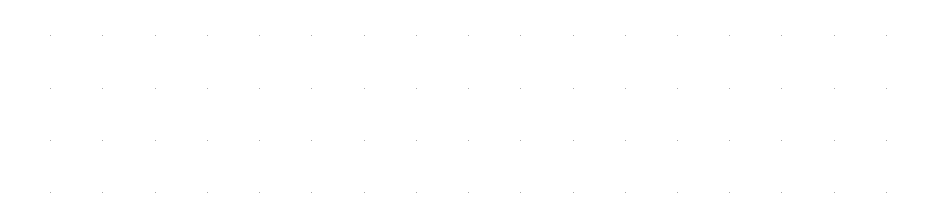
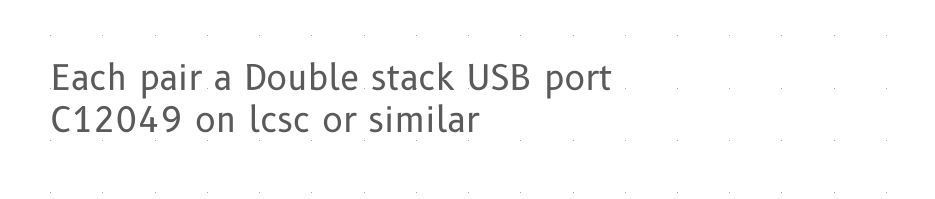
text: none -> Each pair a Double stack USB port (332, 80)
text: none -> C12049 on lcsc or similar (265, 118)

